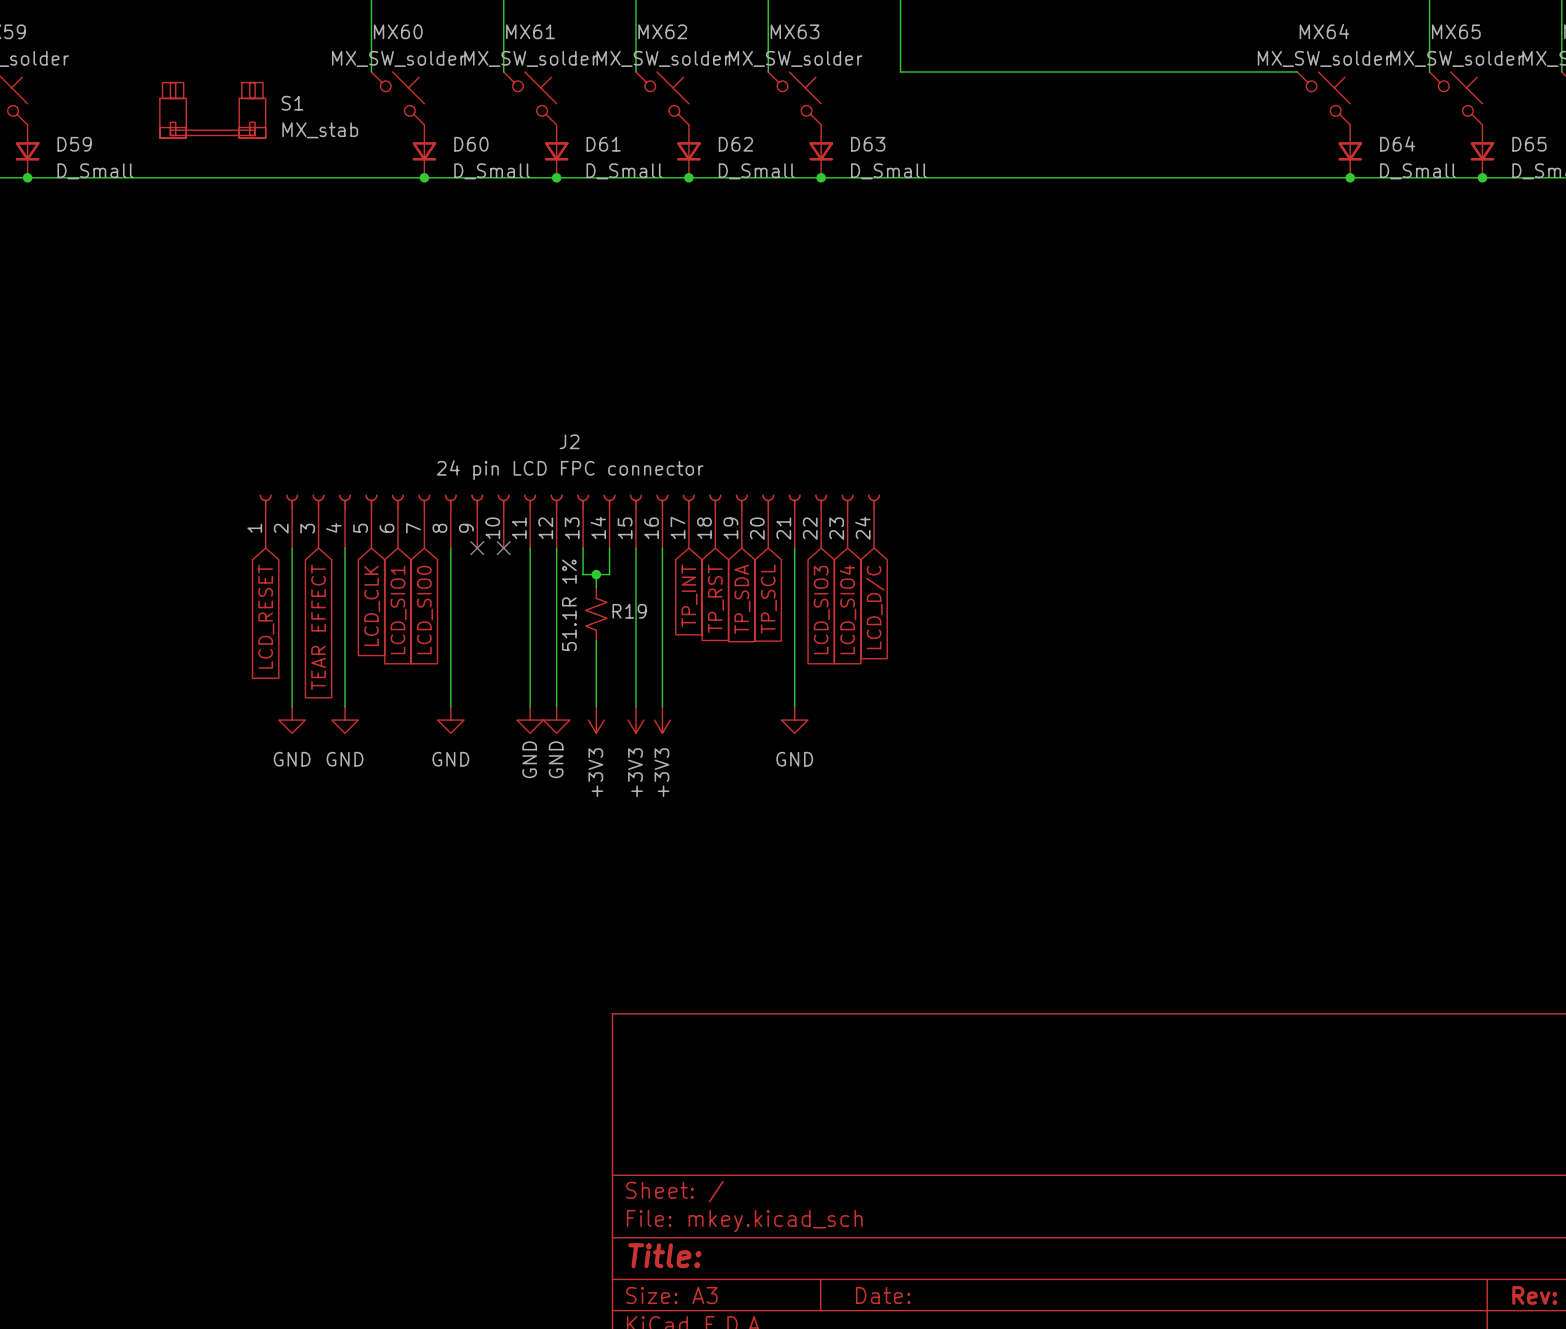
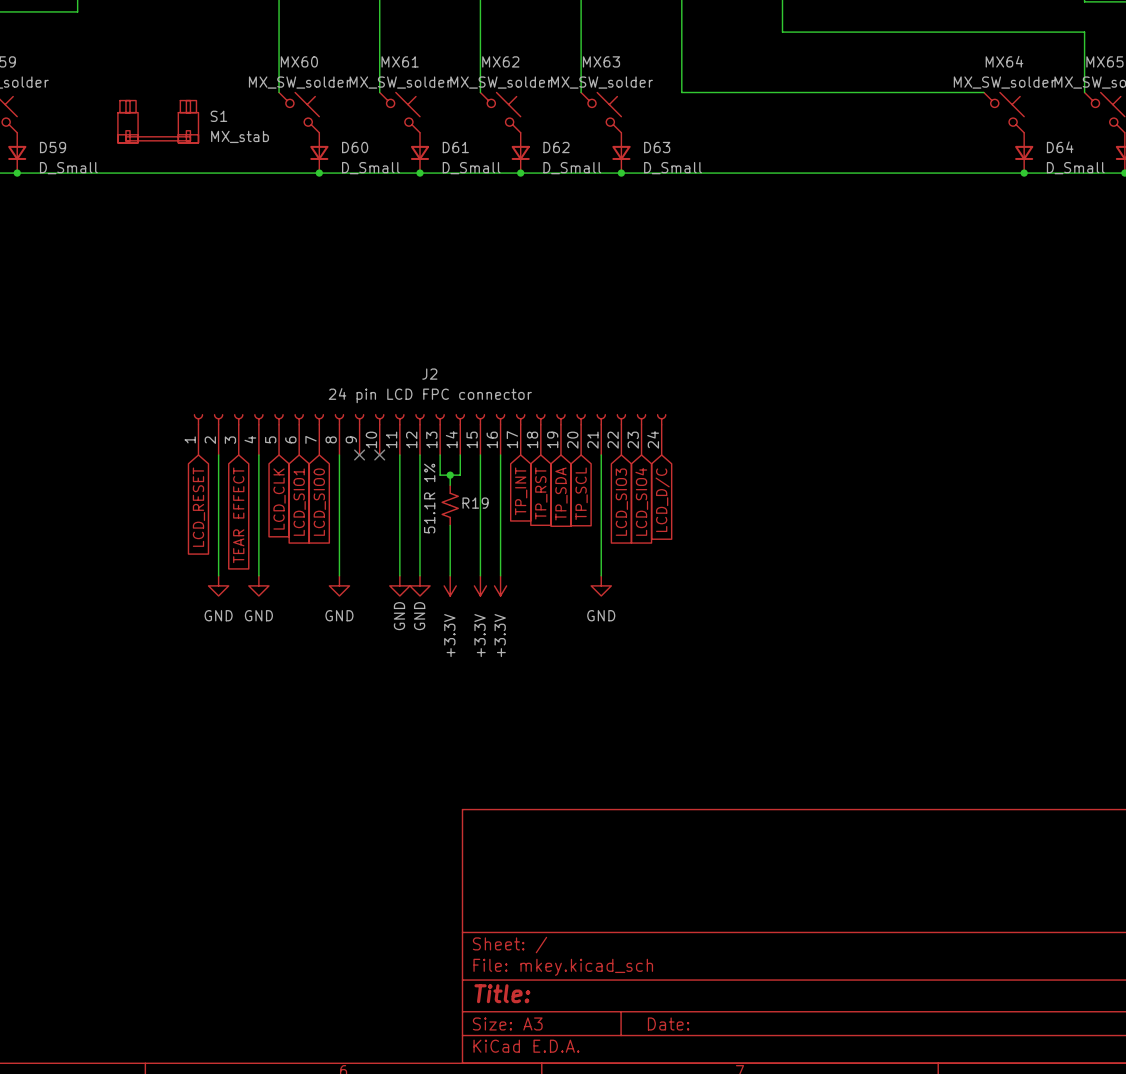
power symbol: +3V3 (596, 720) -> +3.3V (450, 585)
power symbol: +3V3 (635, 720) -> +3.3V (480, 585)
power symbol: +3V3 (662, 720) -> +3.3V (500, 585)

